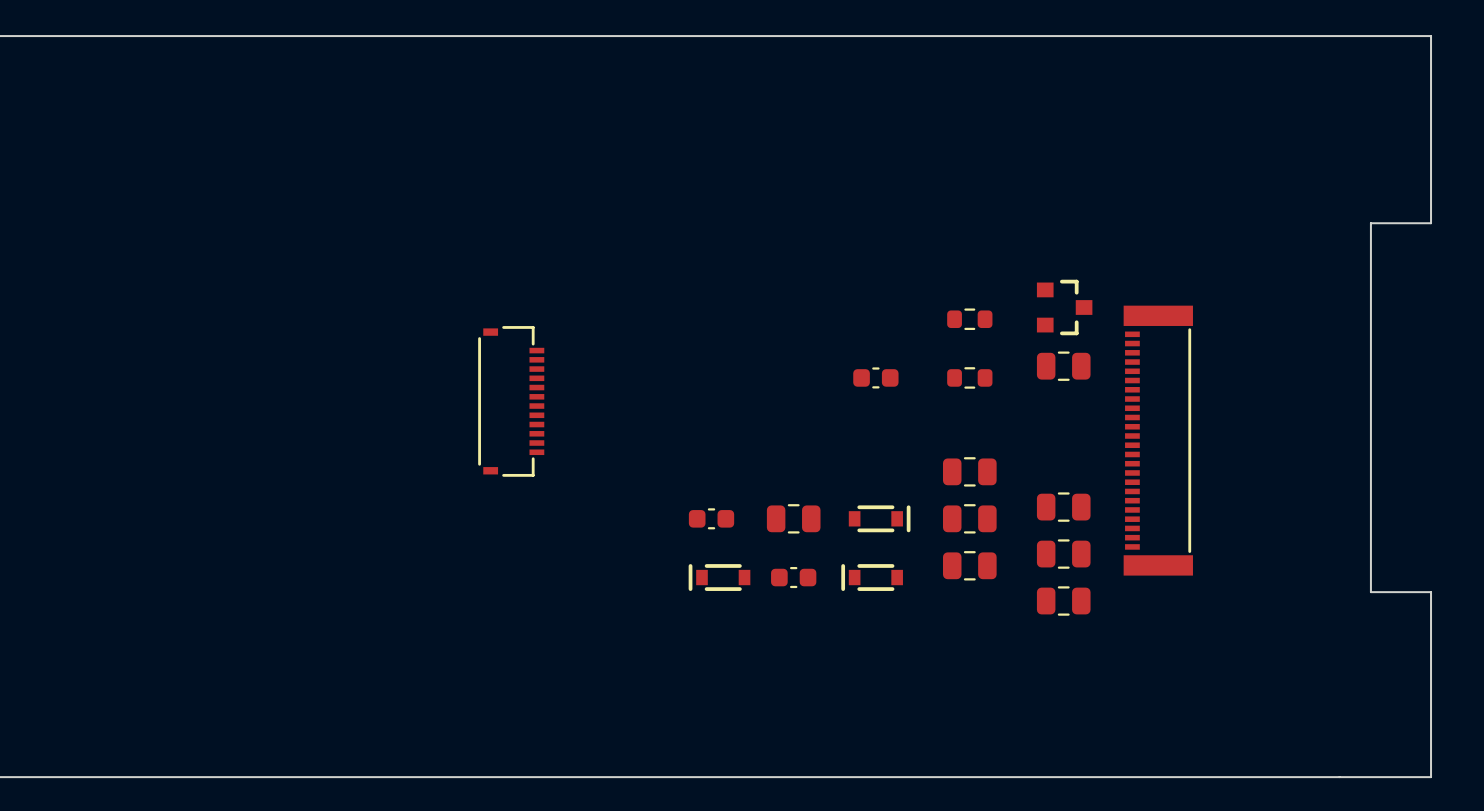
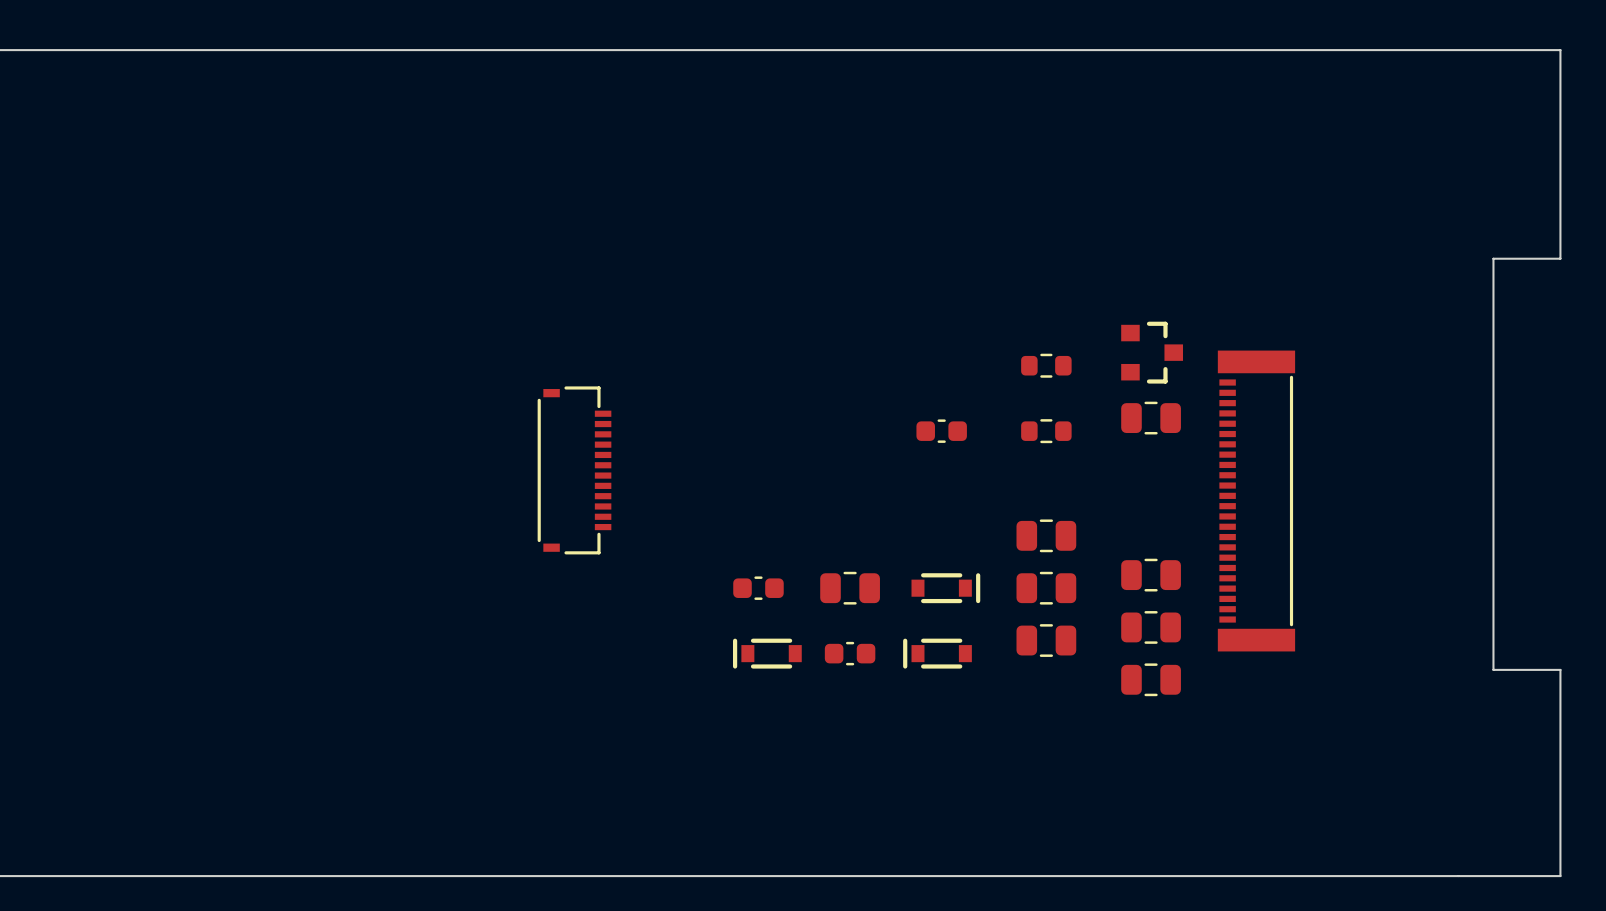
part position: (511, 401) -> (574, 470)

